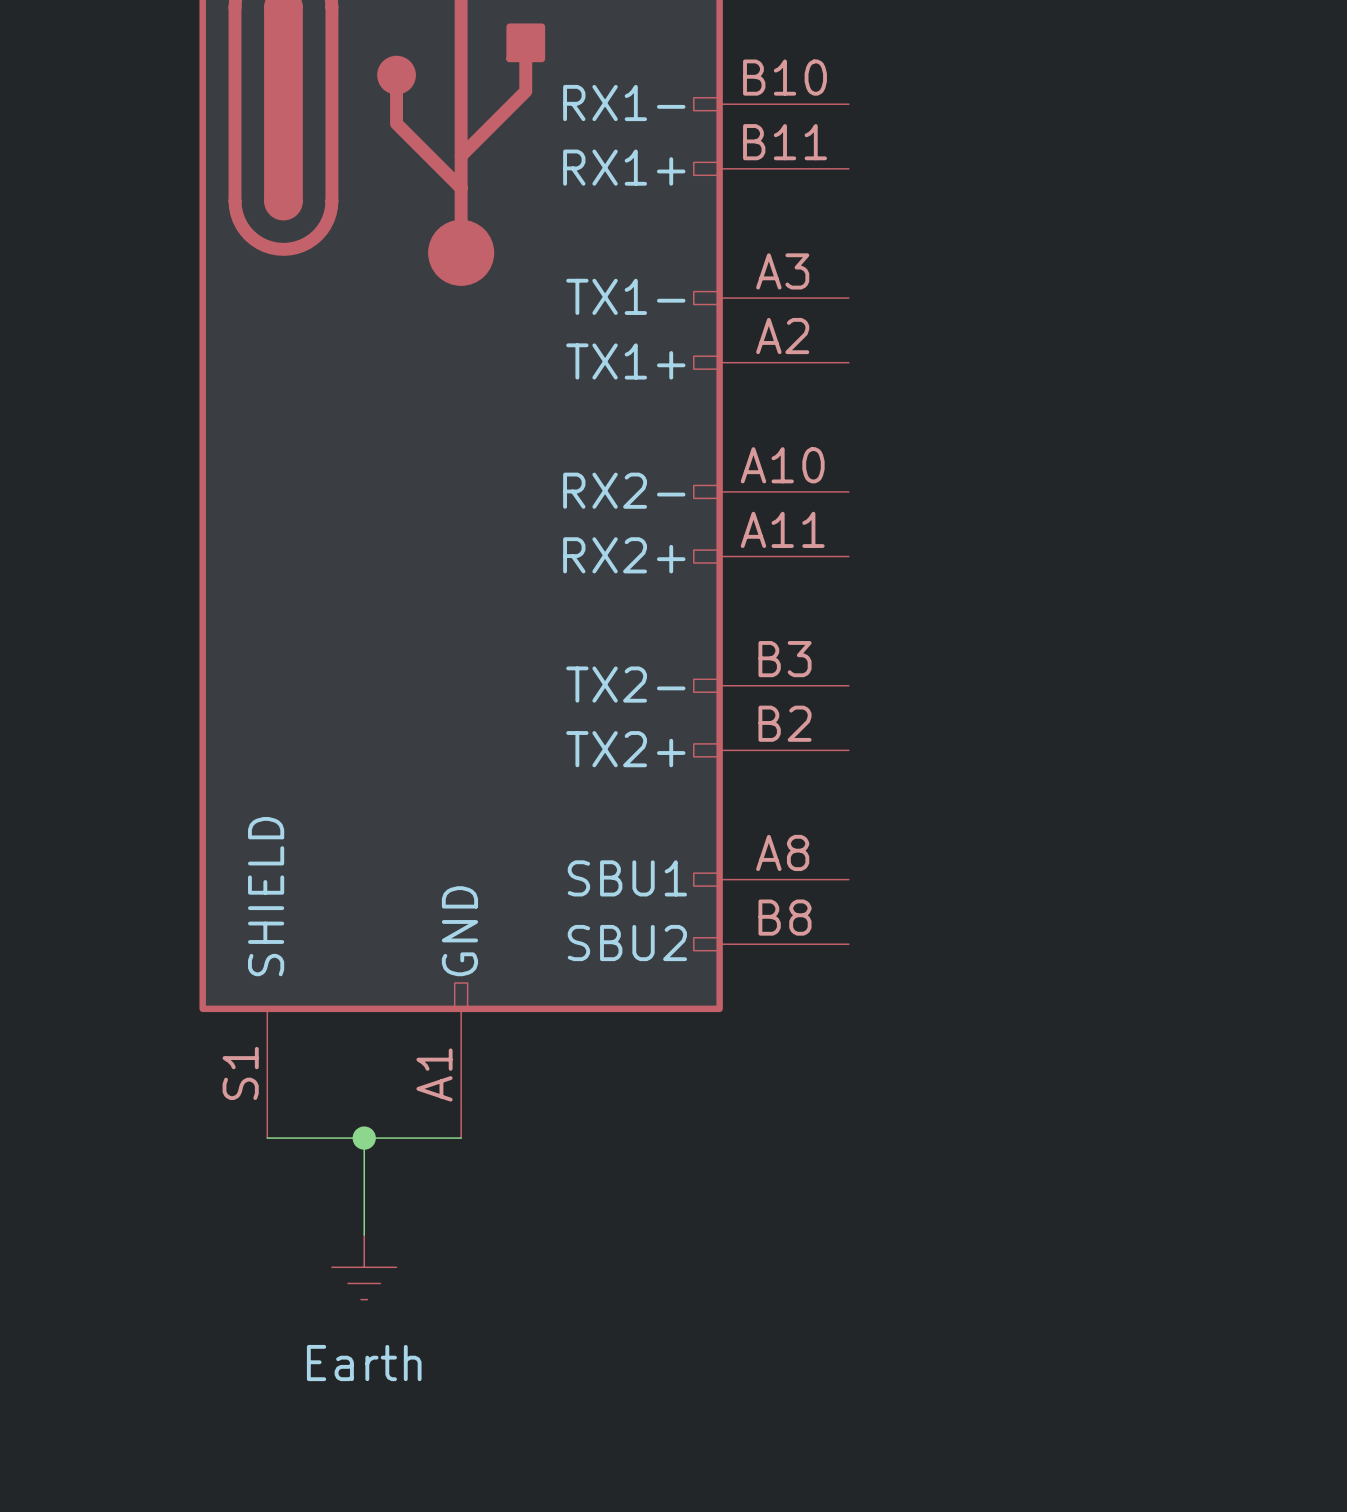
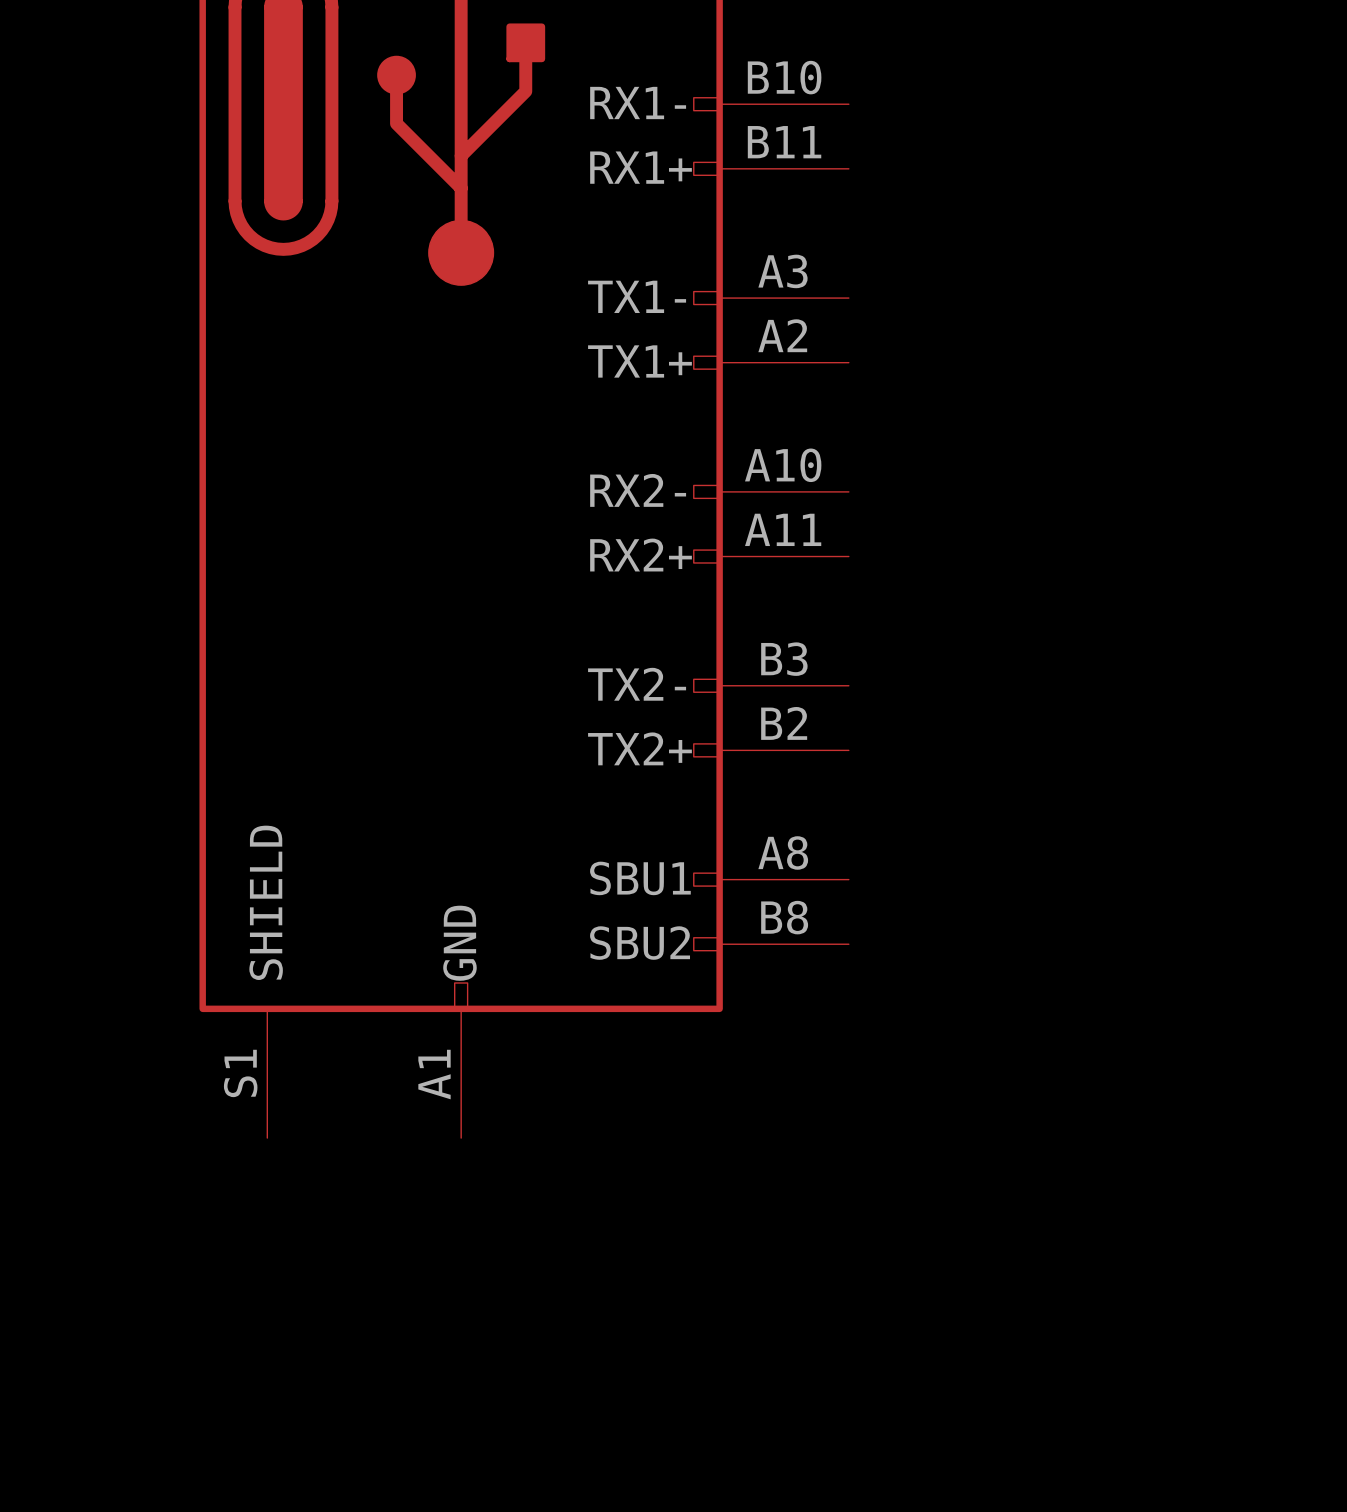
wire: (267, 1138) (461, 1138) -> none
wire: (364, 1138) (364, 1235) -> none
junction: (364, 1138) -> none
power symbol: Earth (364, 1267) -> none

